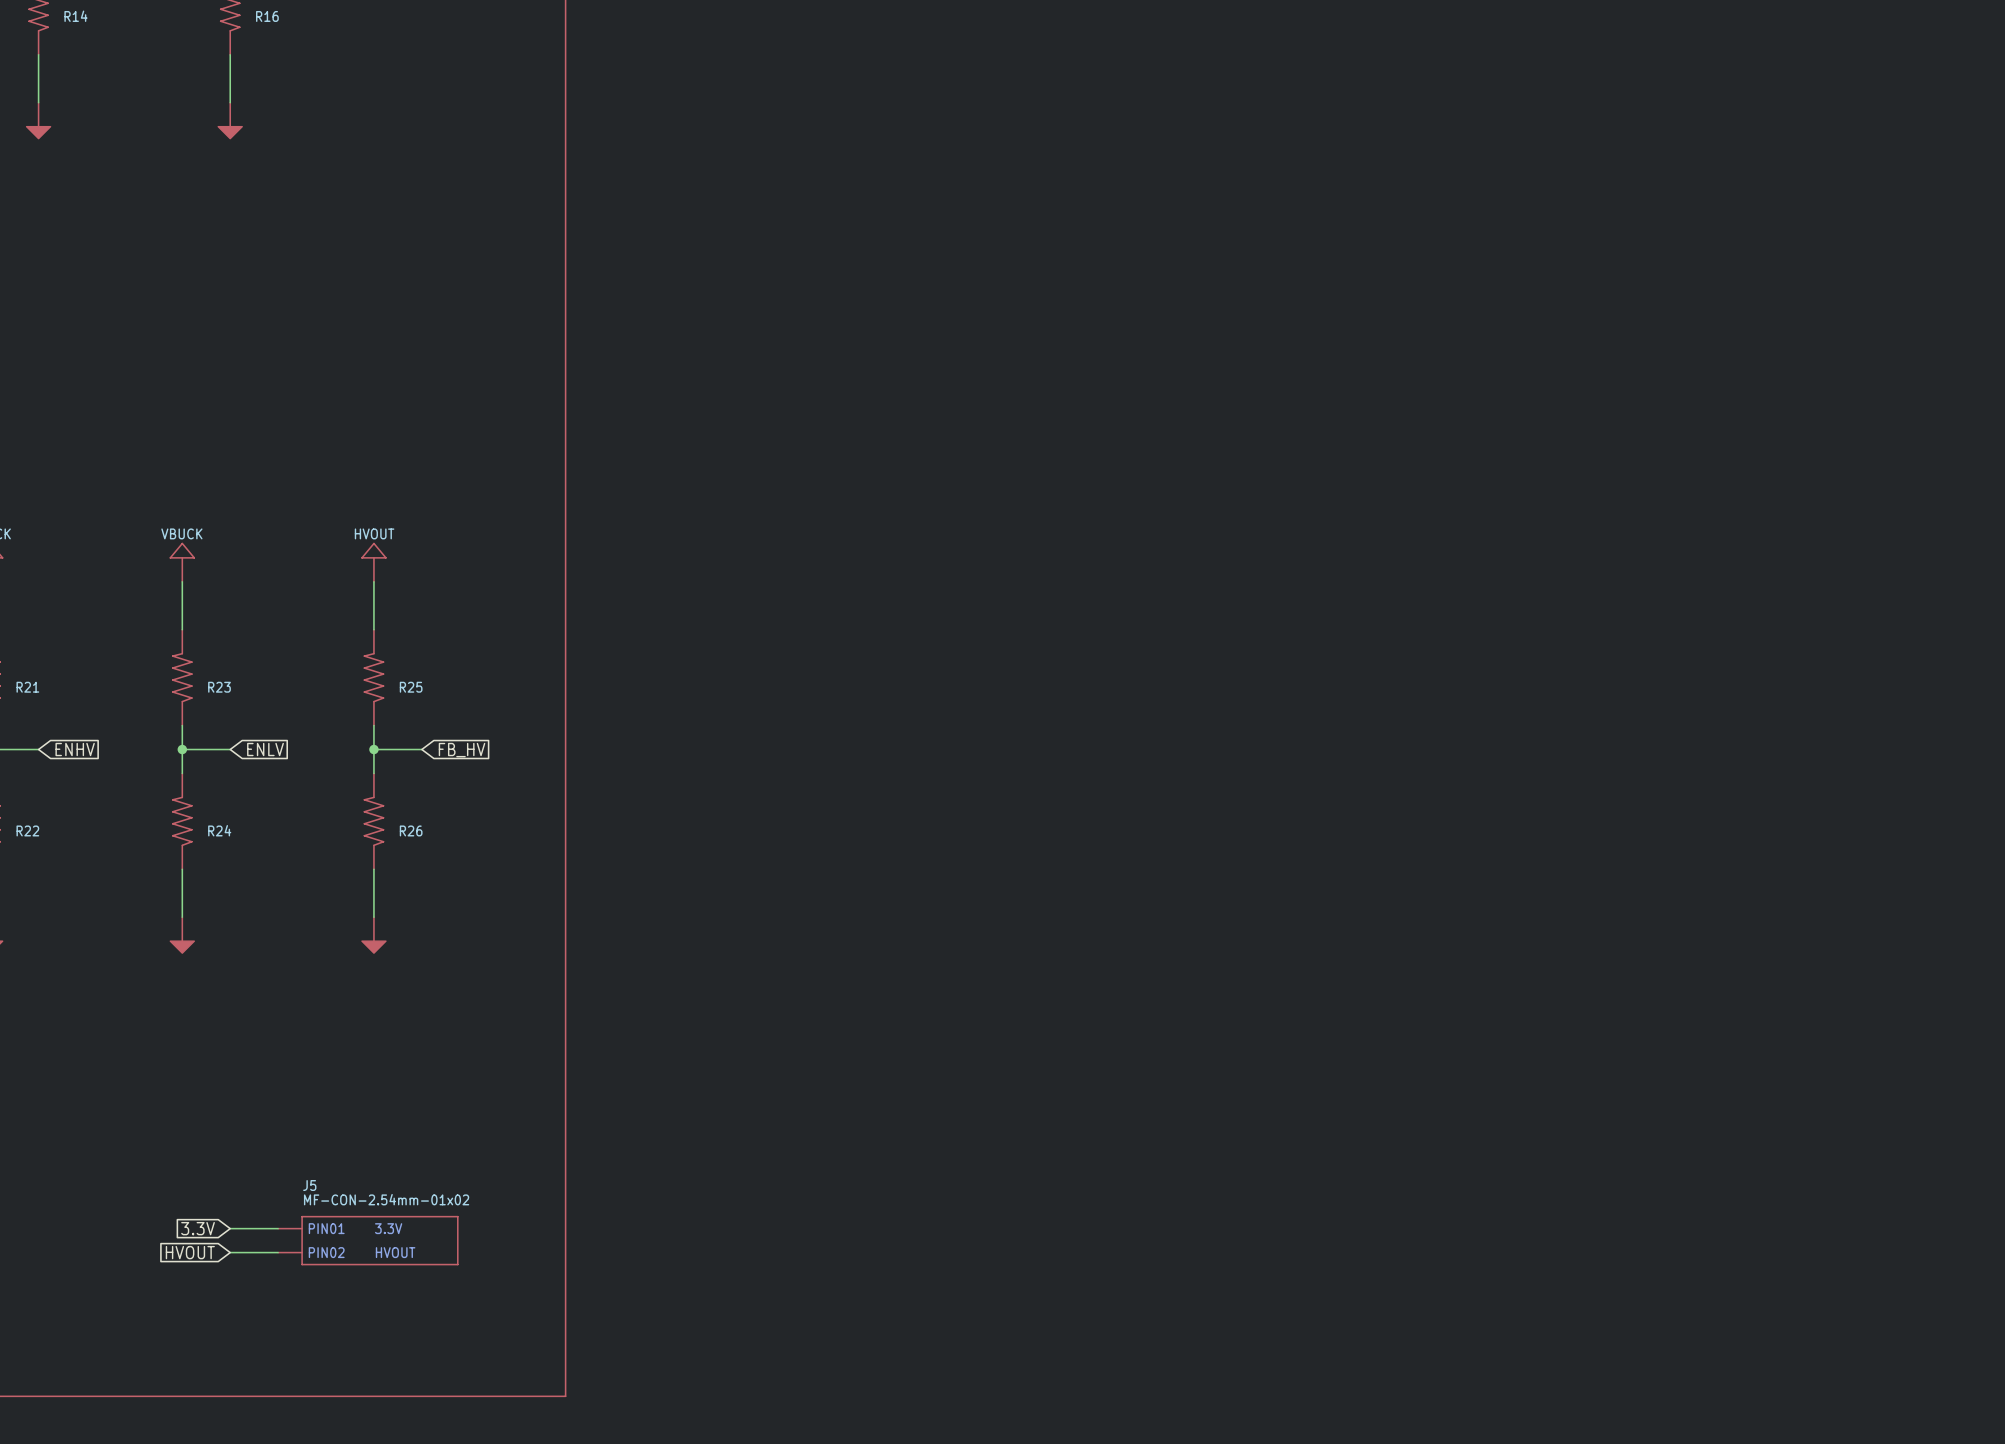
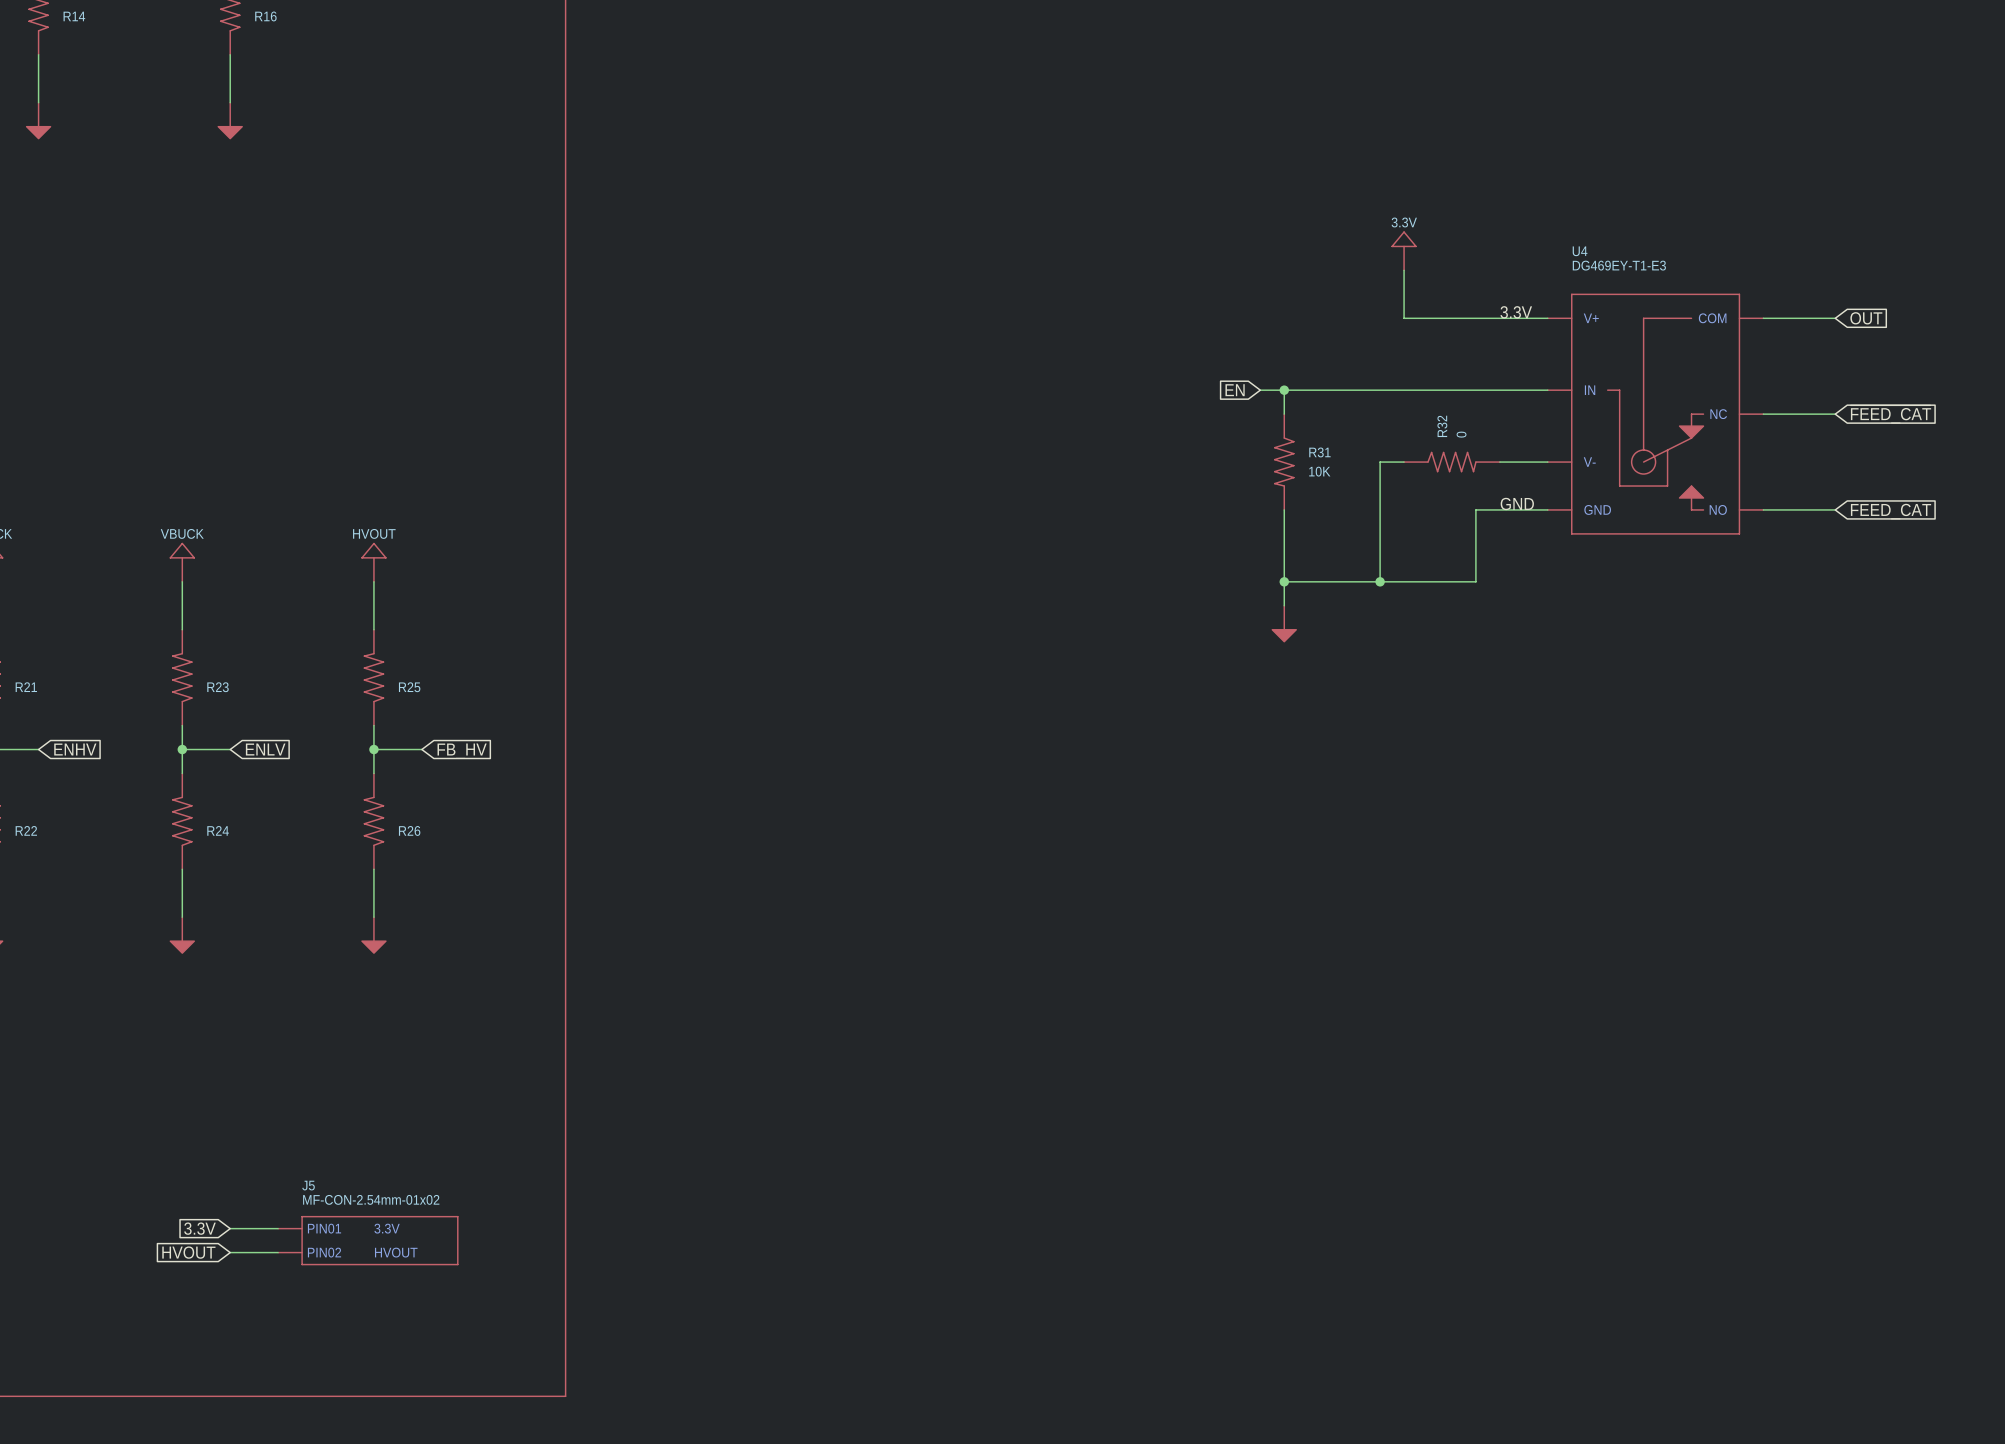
power symbol: none -> 3.3V (1404, 250)
wire: none -> (1404, 270) (1404, 318) (1547, 318)
label: none -> 3.3V (1516, 312)
wire: none -> (1763, 318) (1835, 318)
global label: none -> OUT (1866, 318)
global label: none -> EN (1235, 390)
wire: none -> (1260, 390) (1547, 390)
wire: none -> (1284, 390) (1284, 414)
junction: none -> (1284, 390)
global label: none -> ~{FEED_CAT} (1890, 414)
U4: none -> DG469EY-T1-E3 (1655, 414)
wire: none -> (1763, 414) (1835, 414)
R31: none -> 10K (1284, 462)
wire: none -> (1404, 462) (1380, 462) (1380, 581)
R32: none -> 0 (1451, 462)
wire: none -> (1499, 462) (1547, 462)
label: none -> GND (1517, 503)
wire: none -> (1284, 509) (1284, 605)
wire: none -> (1547, 509) (1475, 509) (1475, 581) (1284, 581)
wire: none -> (1763, 509) (1835, 509)
global label: none -> FEED_CAT (1891, 511)
junction: none -> (1284, 581)
junction: none -> (1380, 581)
power symbol: none -> (1284, 624)

